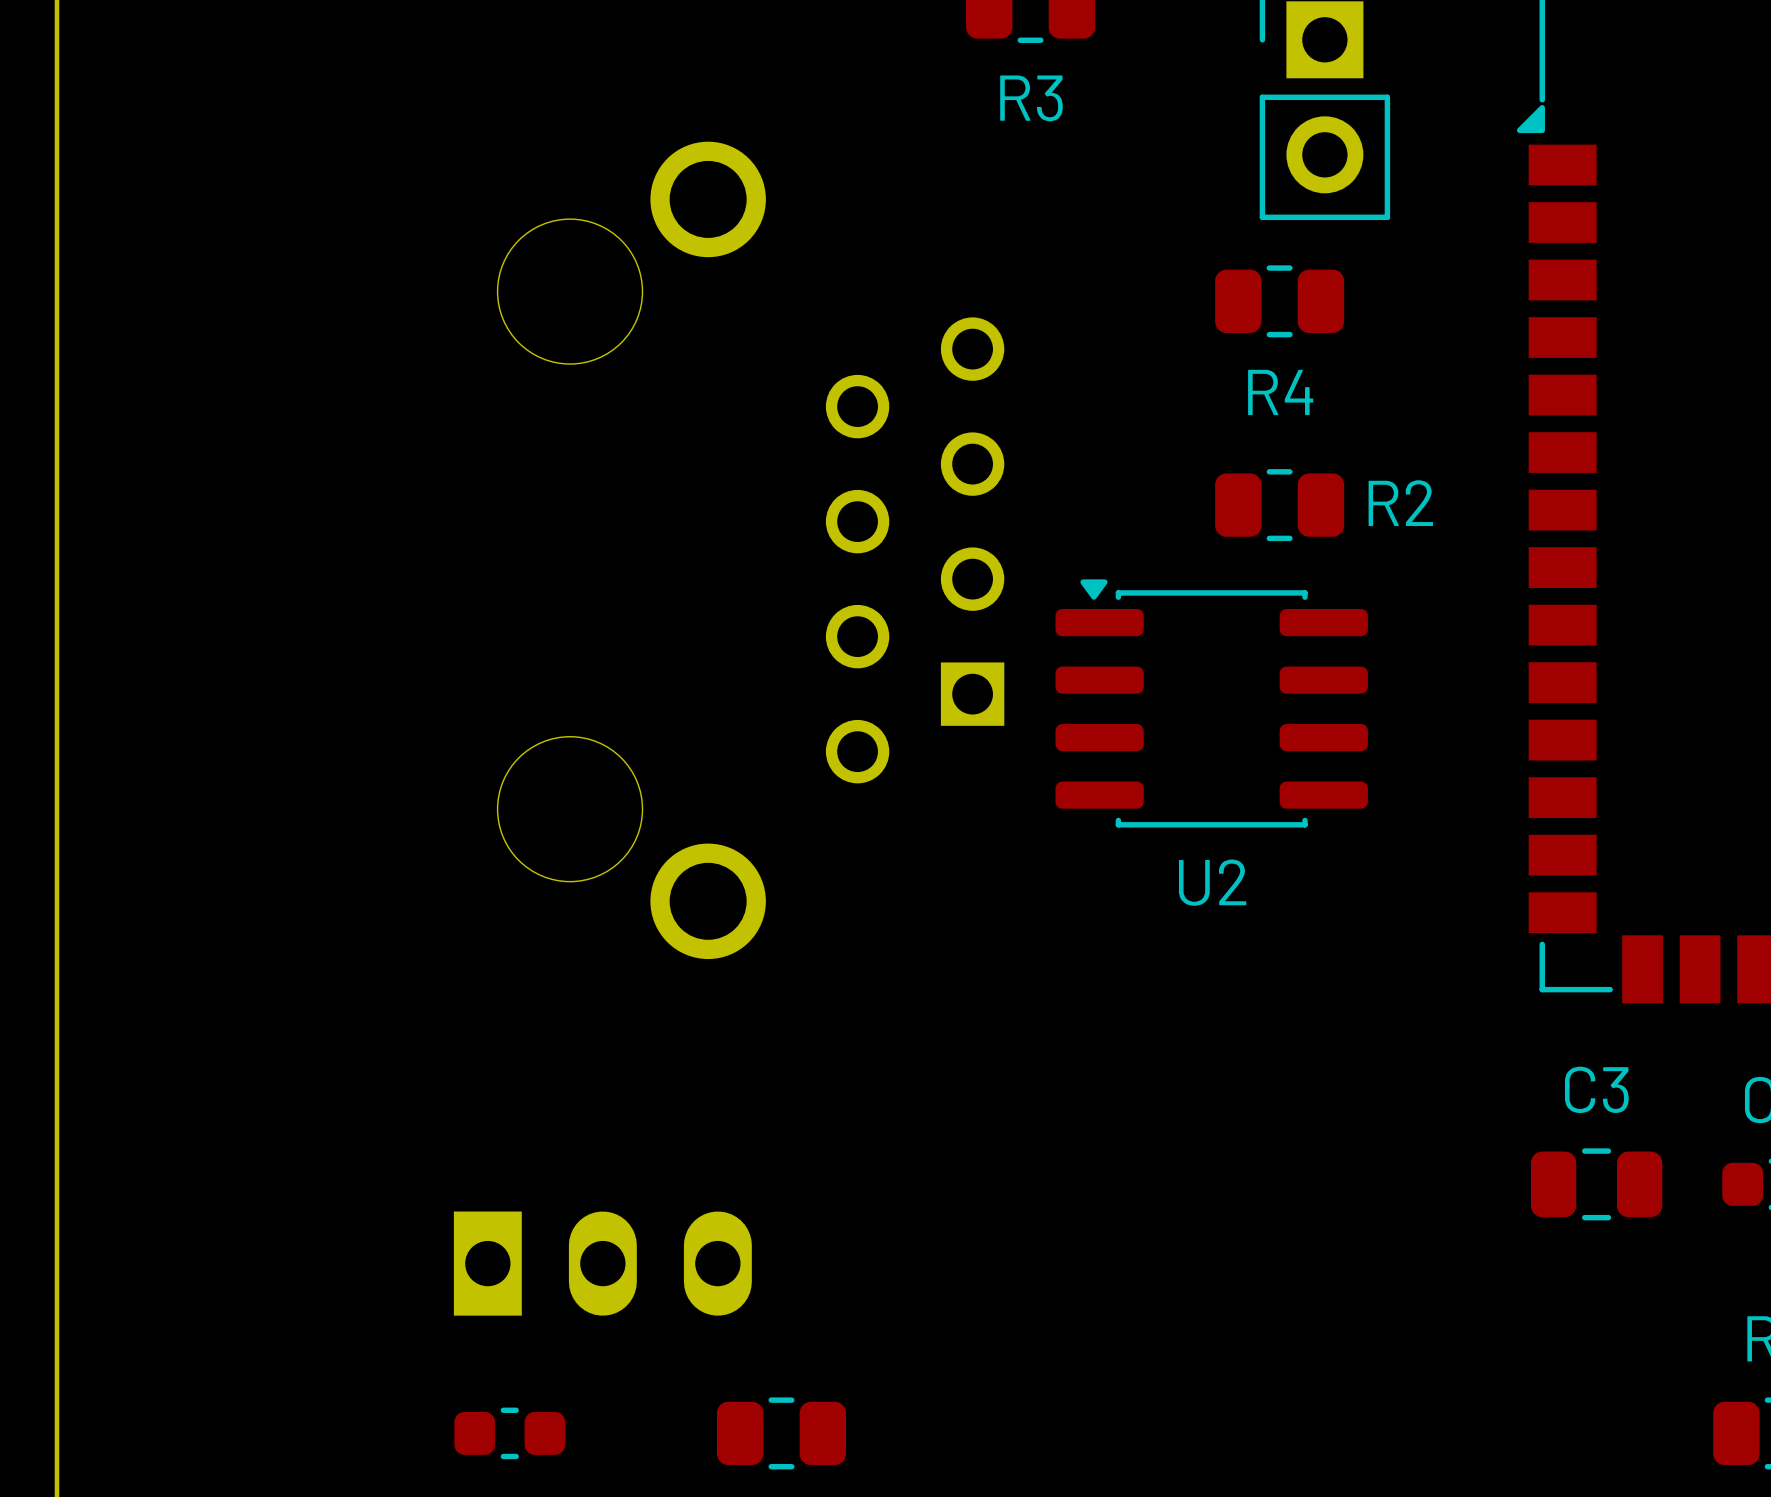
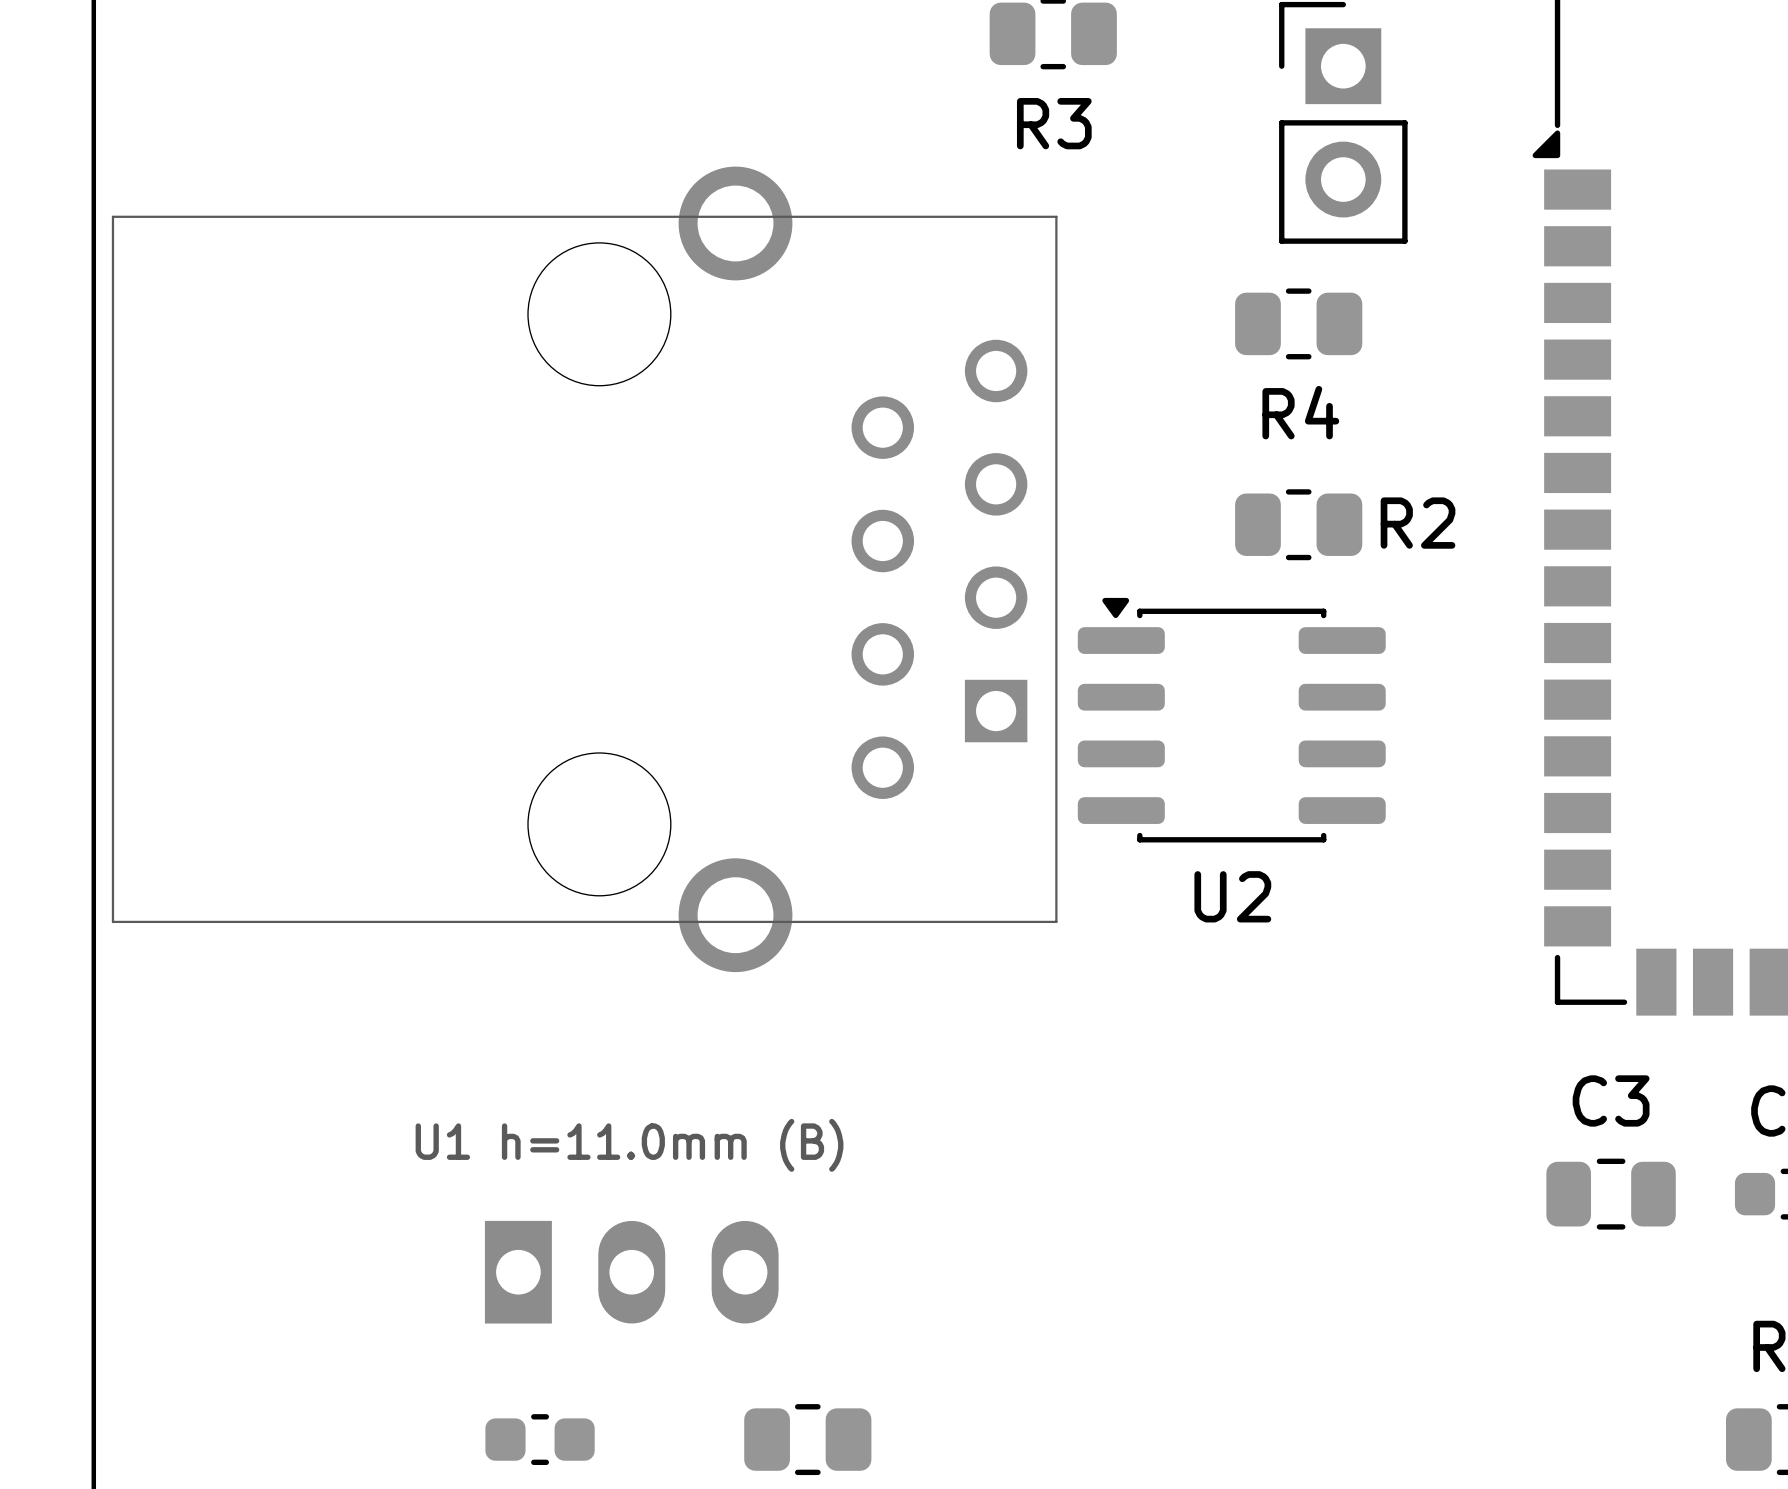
line: none -> (112, 216) (1056, 216) (1056, 921) (112, 921) (112, 216)
text: none -> U1 h=11.0mm (B) (629, 1145)

